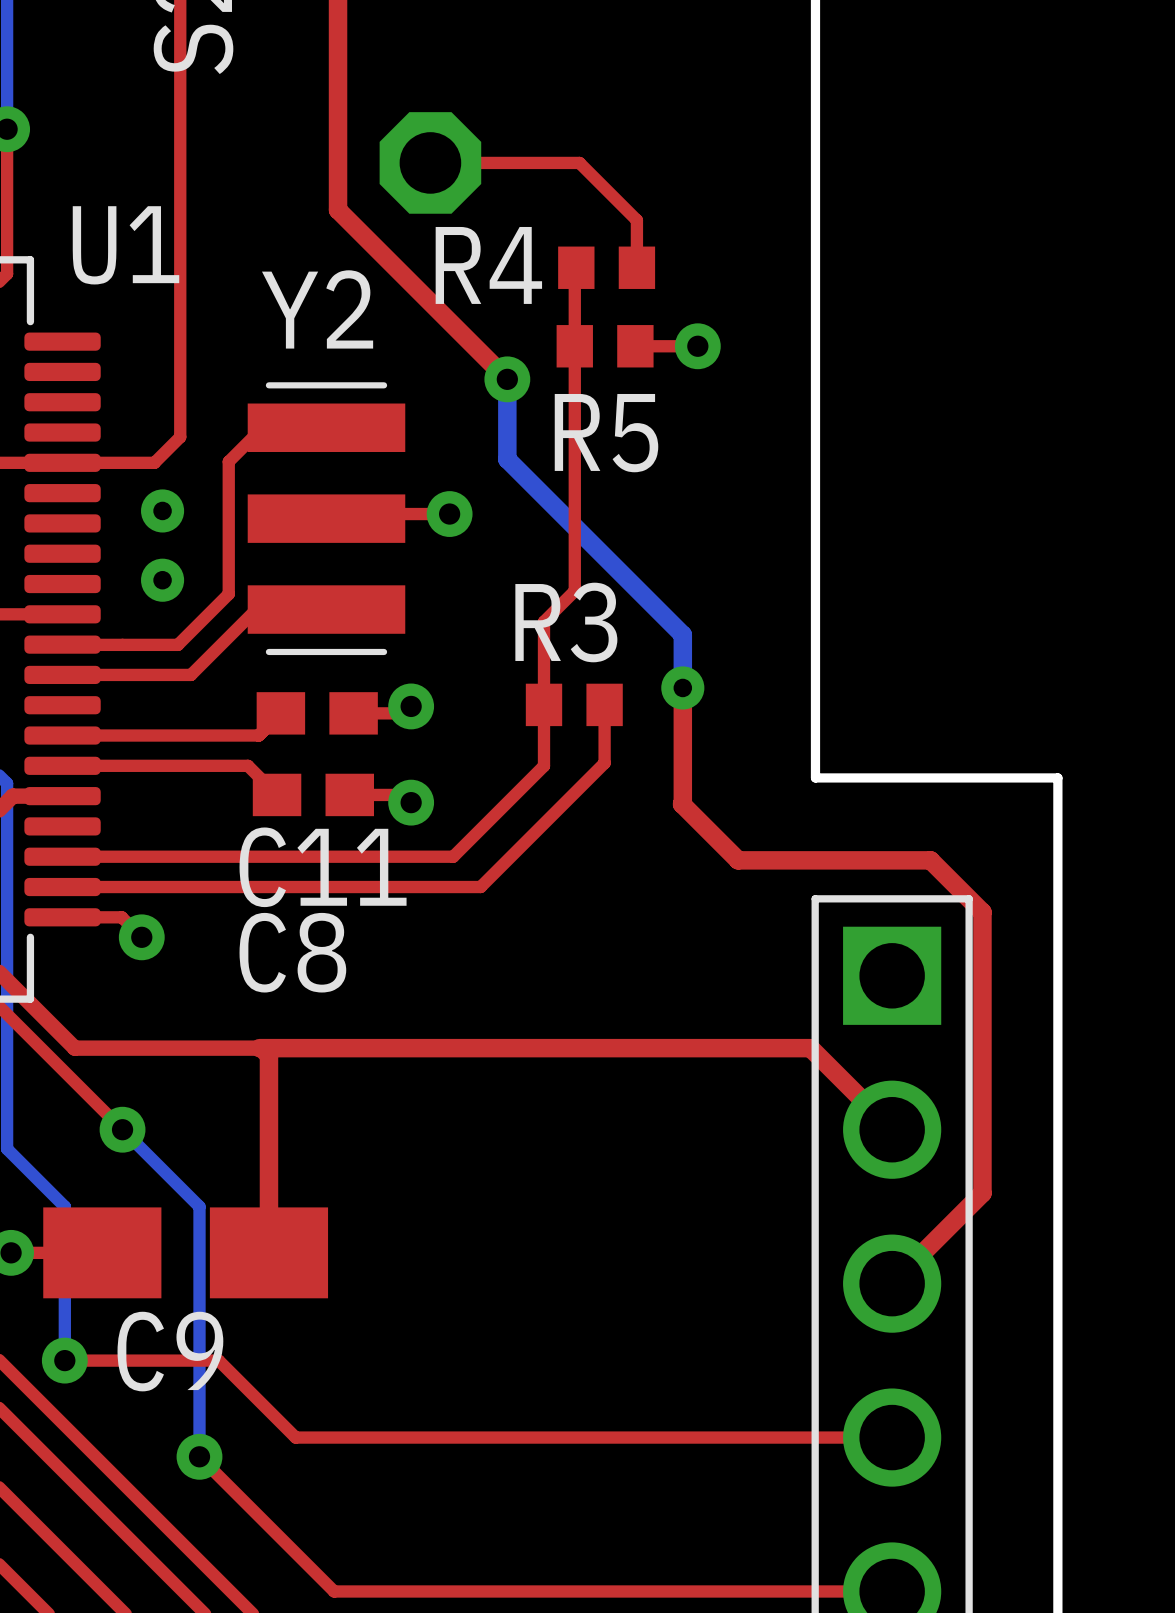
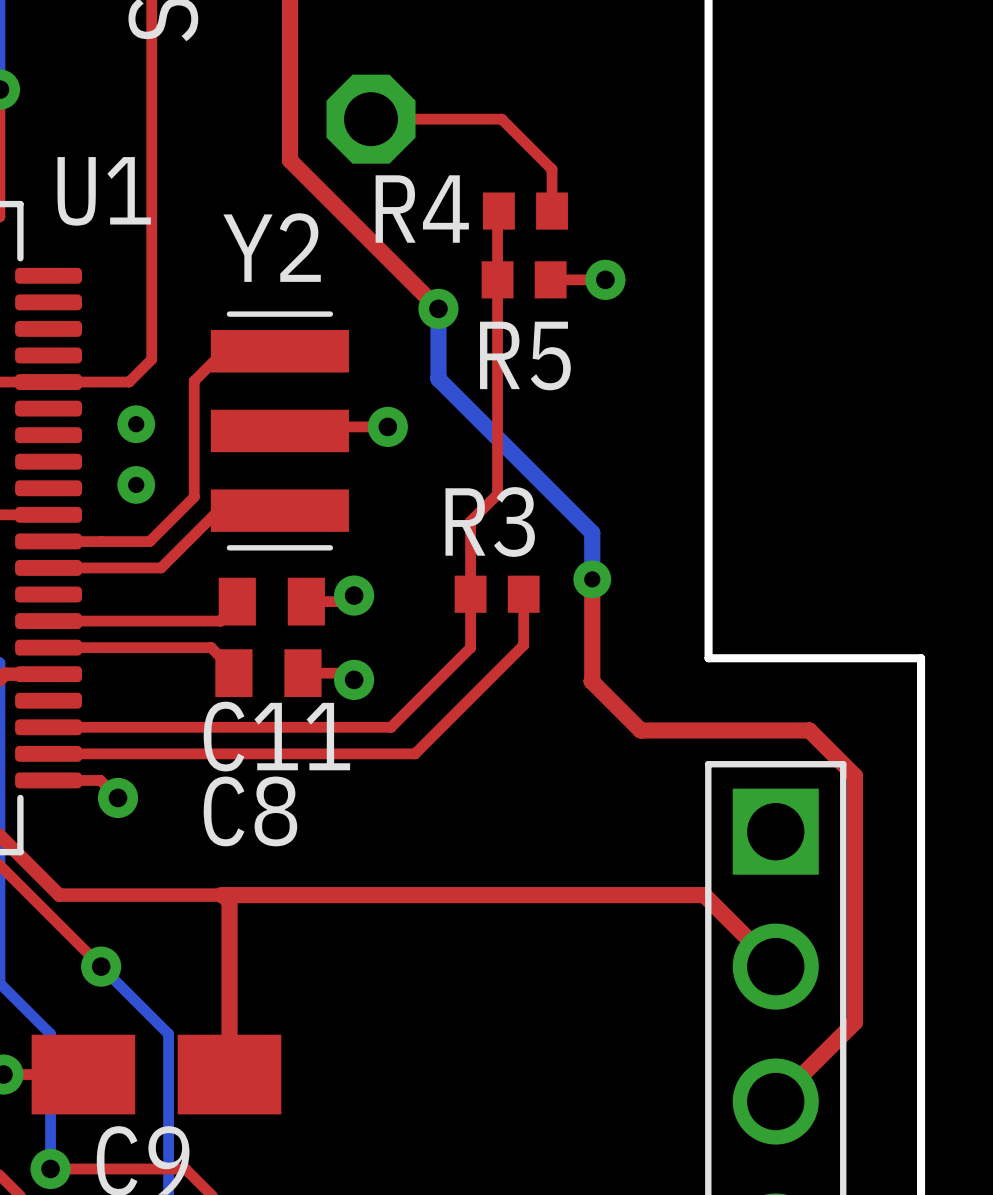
C11 footprint: [256, 692, 378, 735] -> [218, 577, 325, 626]
C8 footprint: [252, 773, 375, 817] -> [215, 649, 322, 698]

